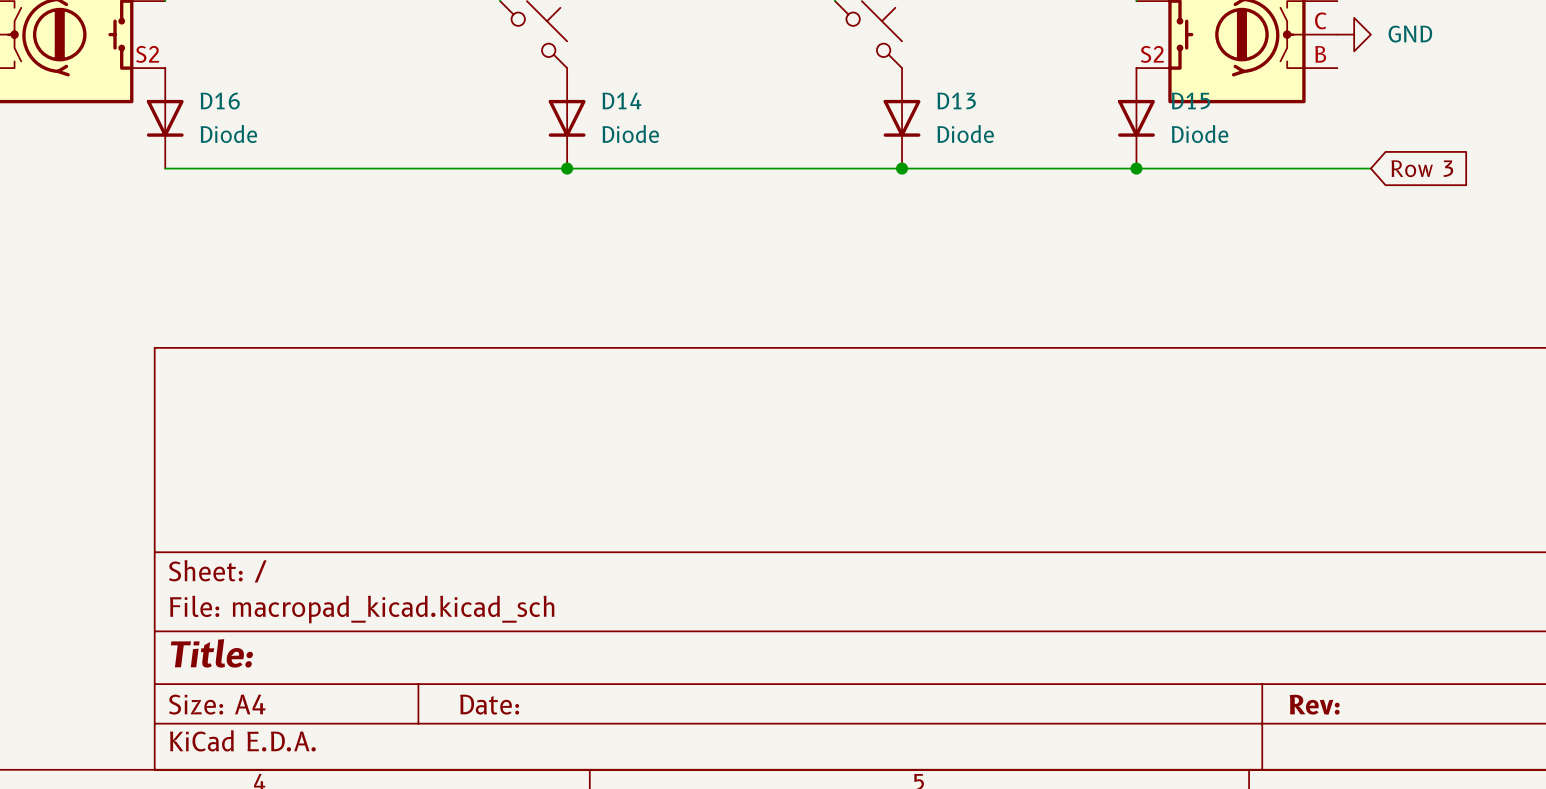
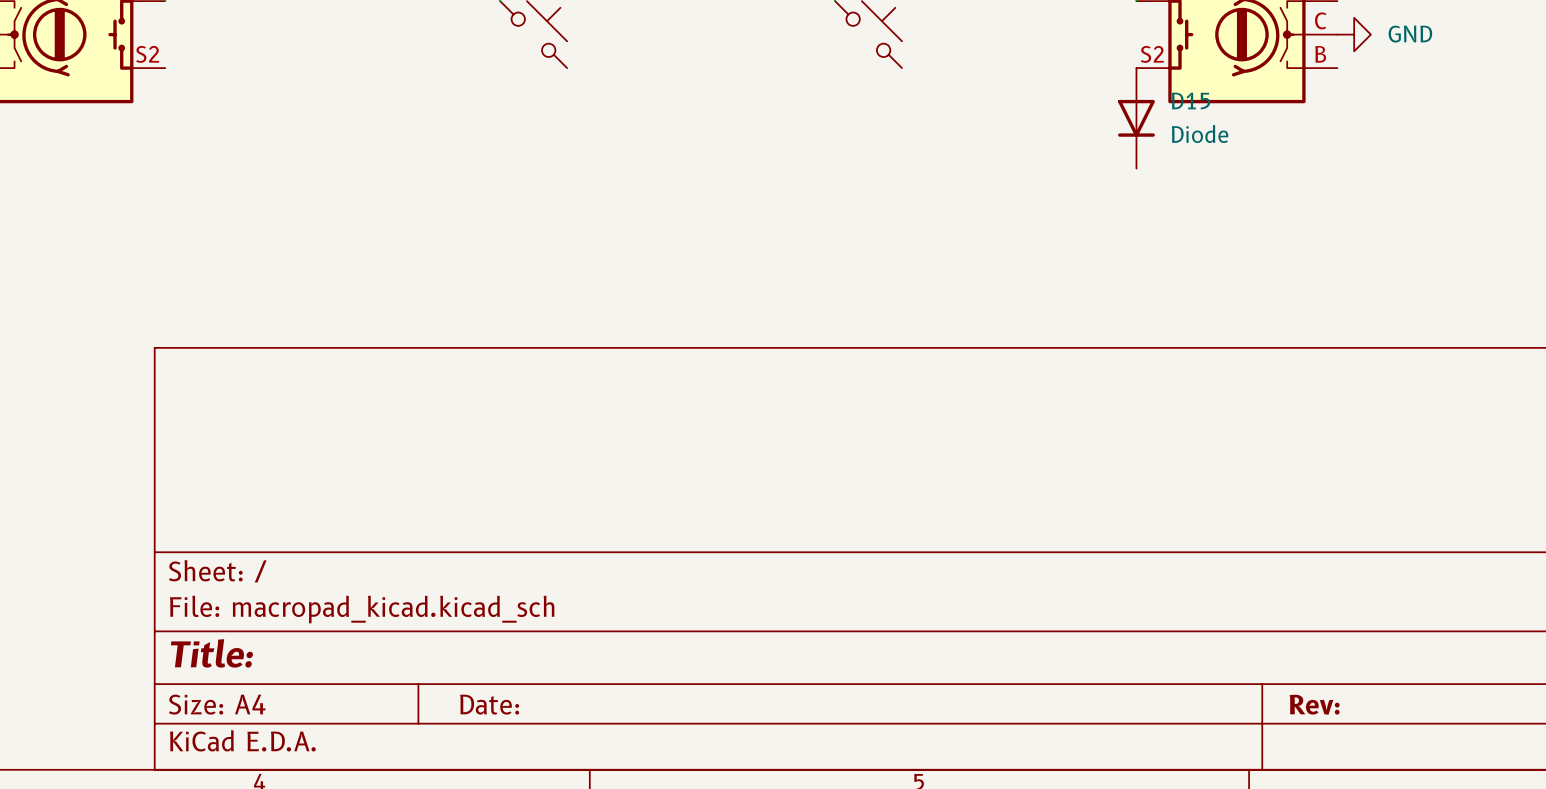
D16: Diode (165, 118) -> none
D14: Diode (567, 118) -> none
D13: Diode (902, 118) -> none
wire: (165, 168) (1370, 168) -> none
junction: (567, 168) -> none
junction: (902, 168) -> none
junction: (1136, 168) -> none
global label: Row 3 (1422, 168) -> none

